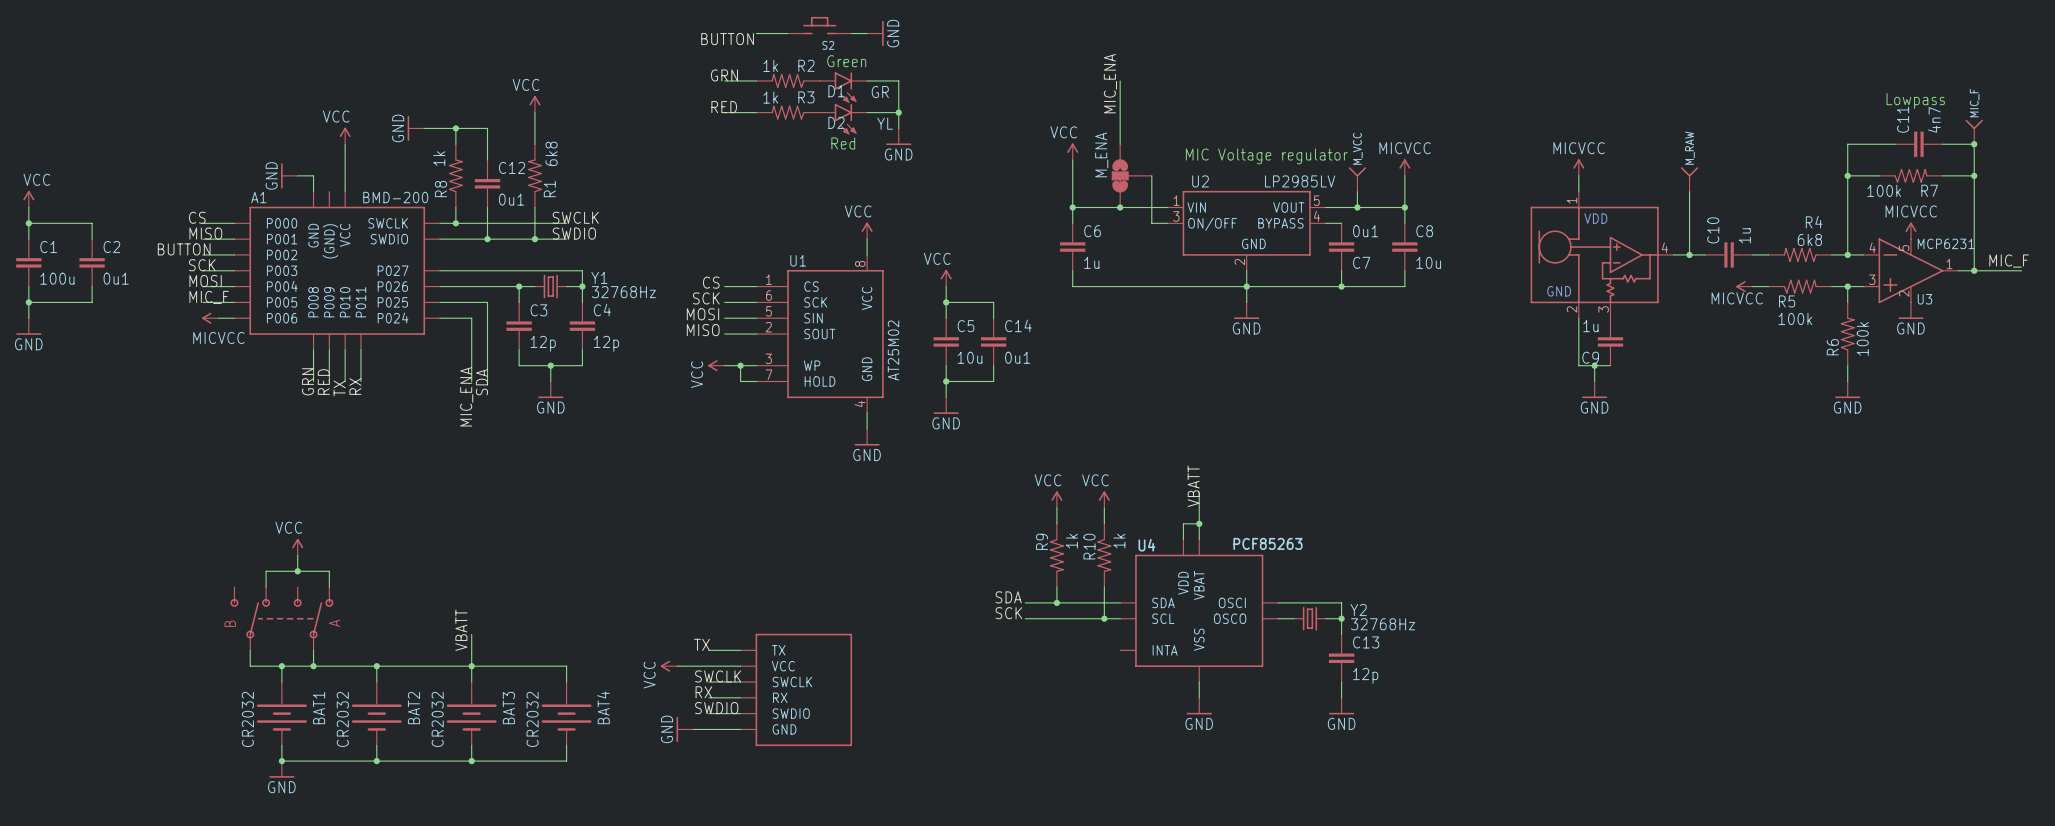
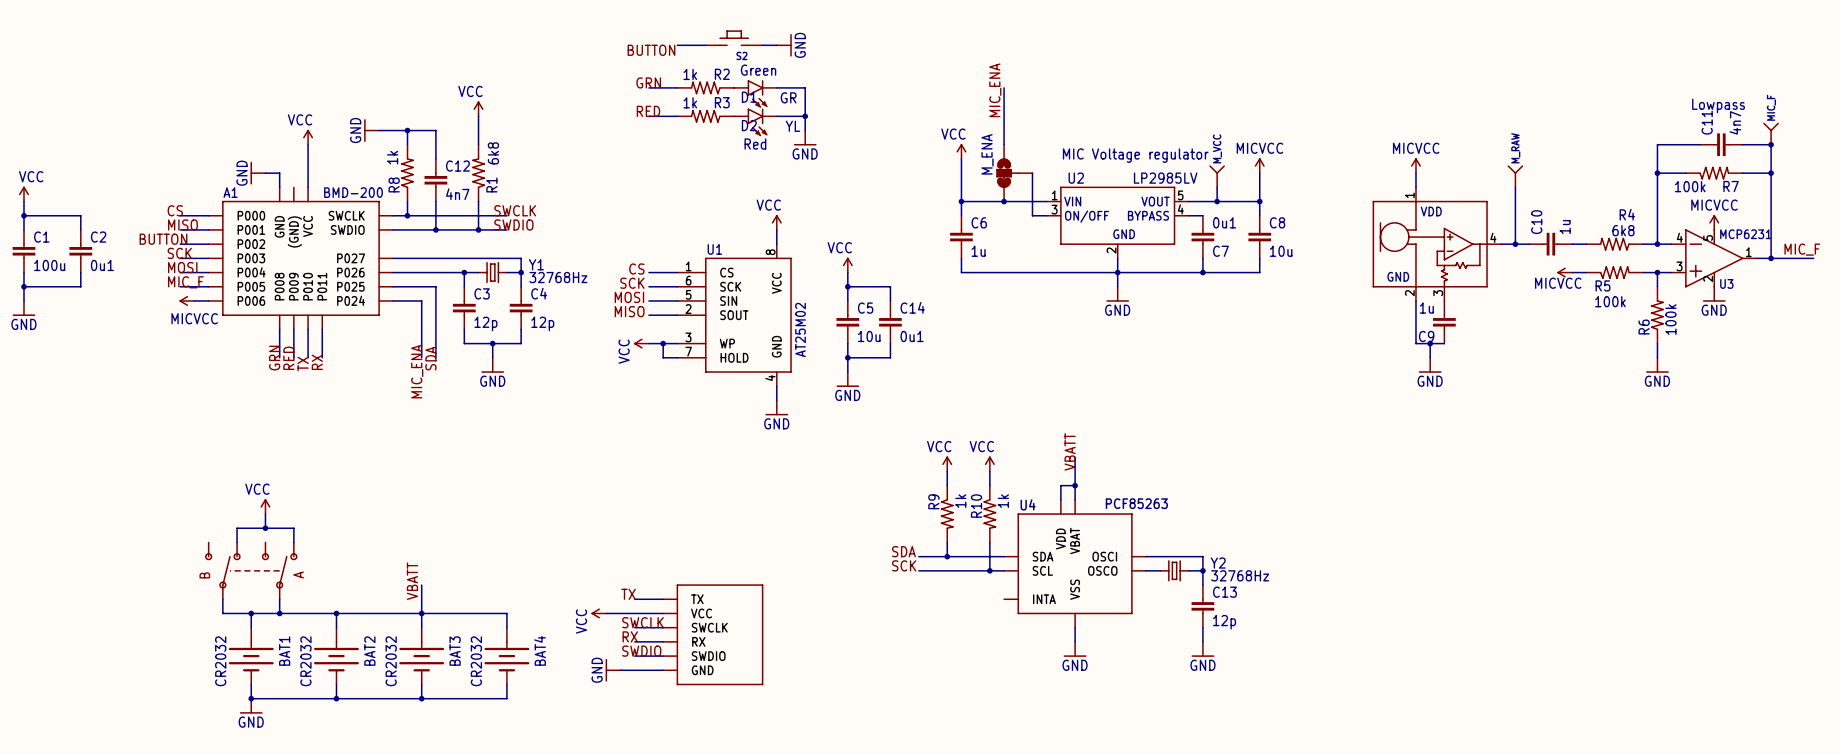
C12 value: 0u1 (511, 199) -> 4n7 (457, 194)

